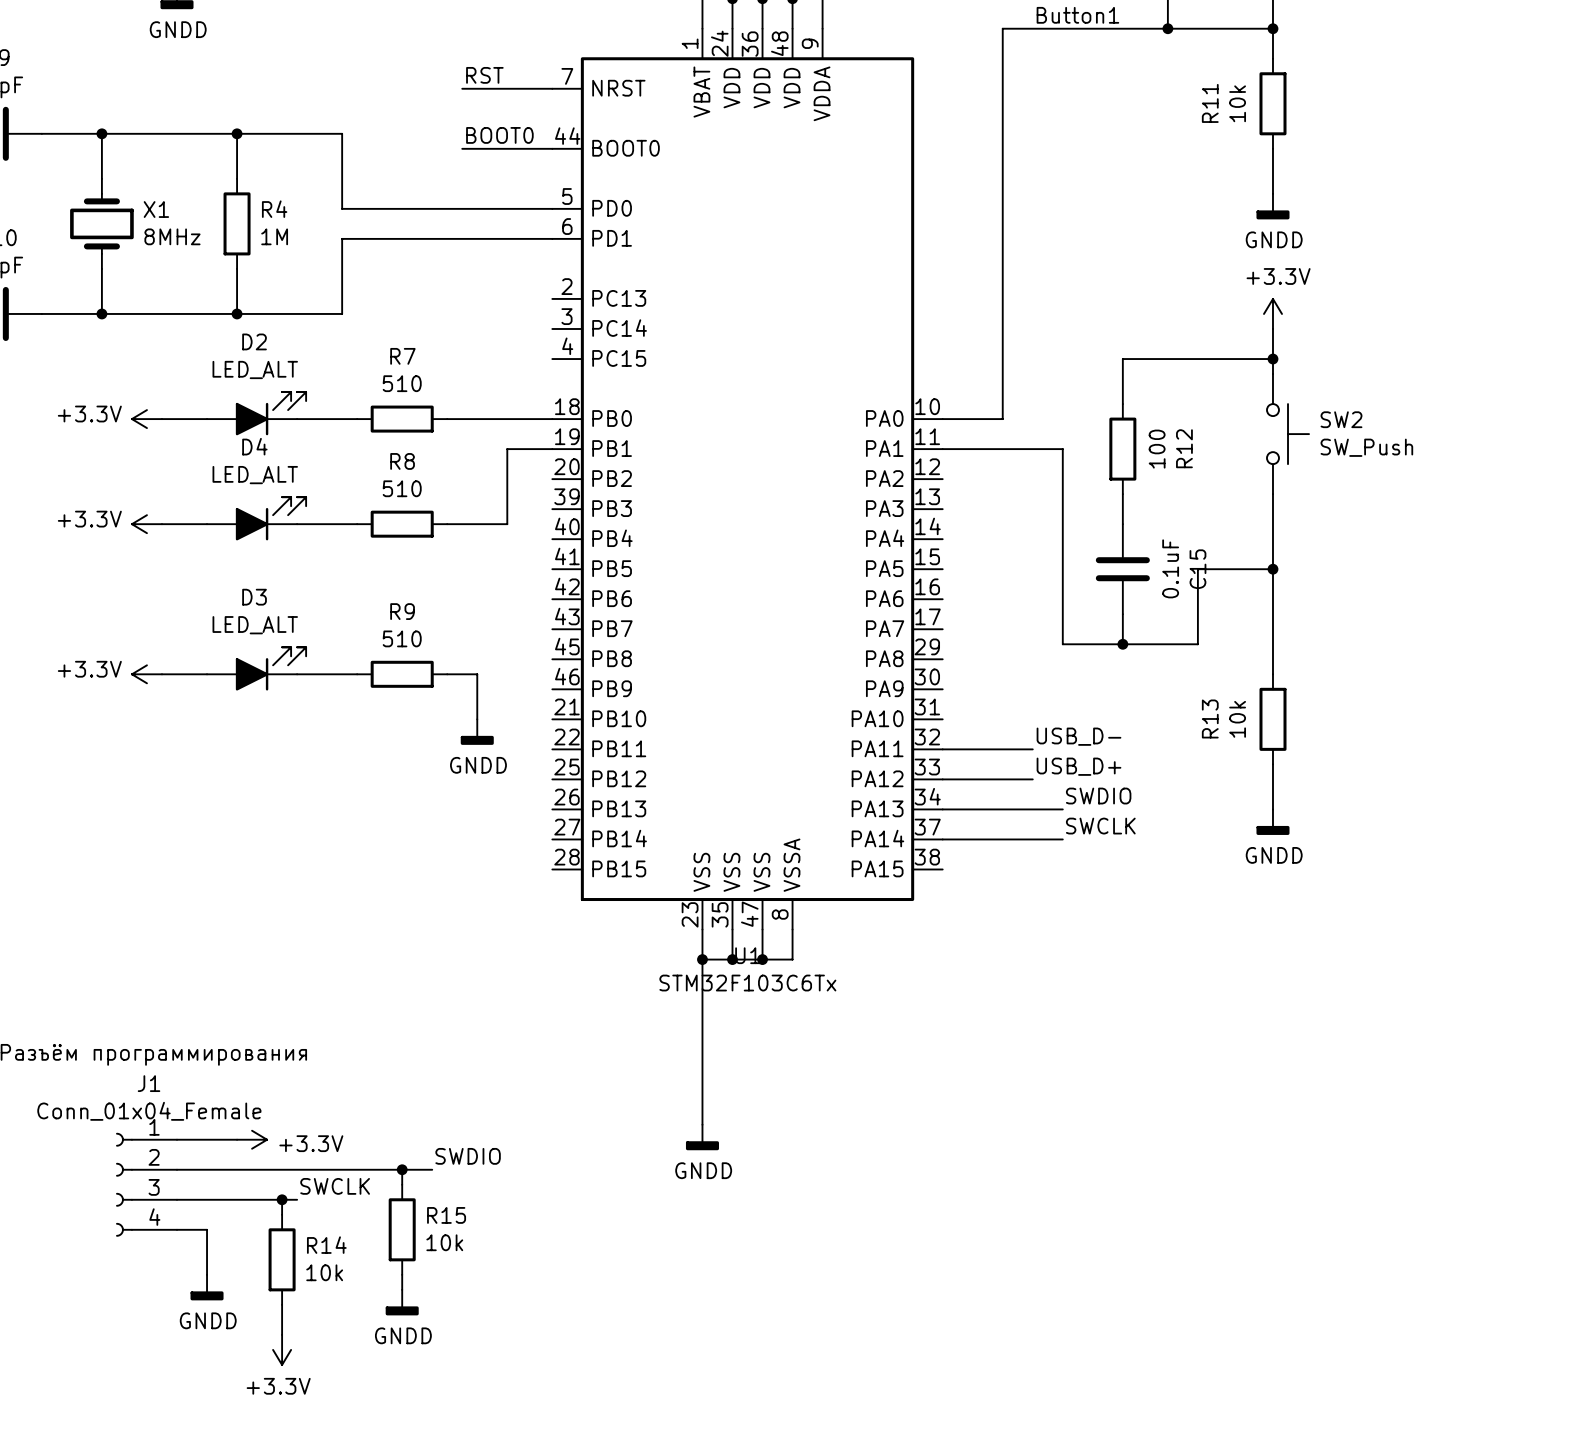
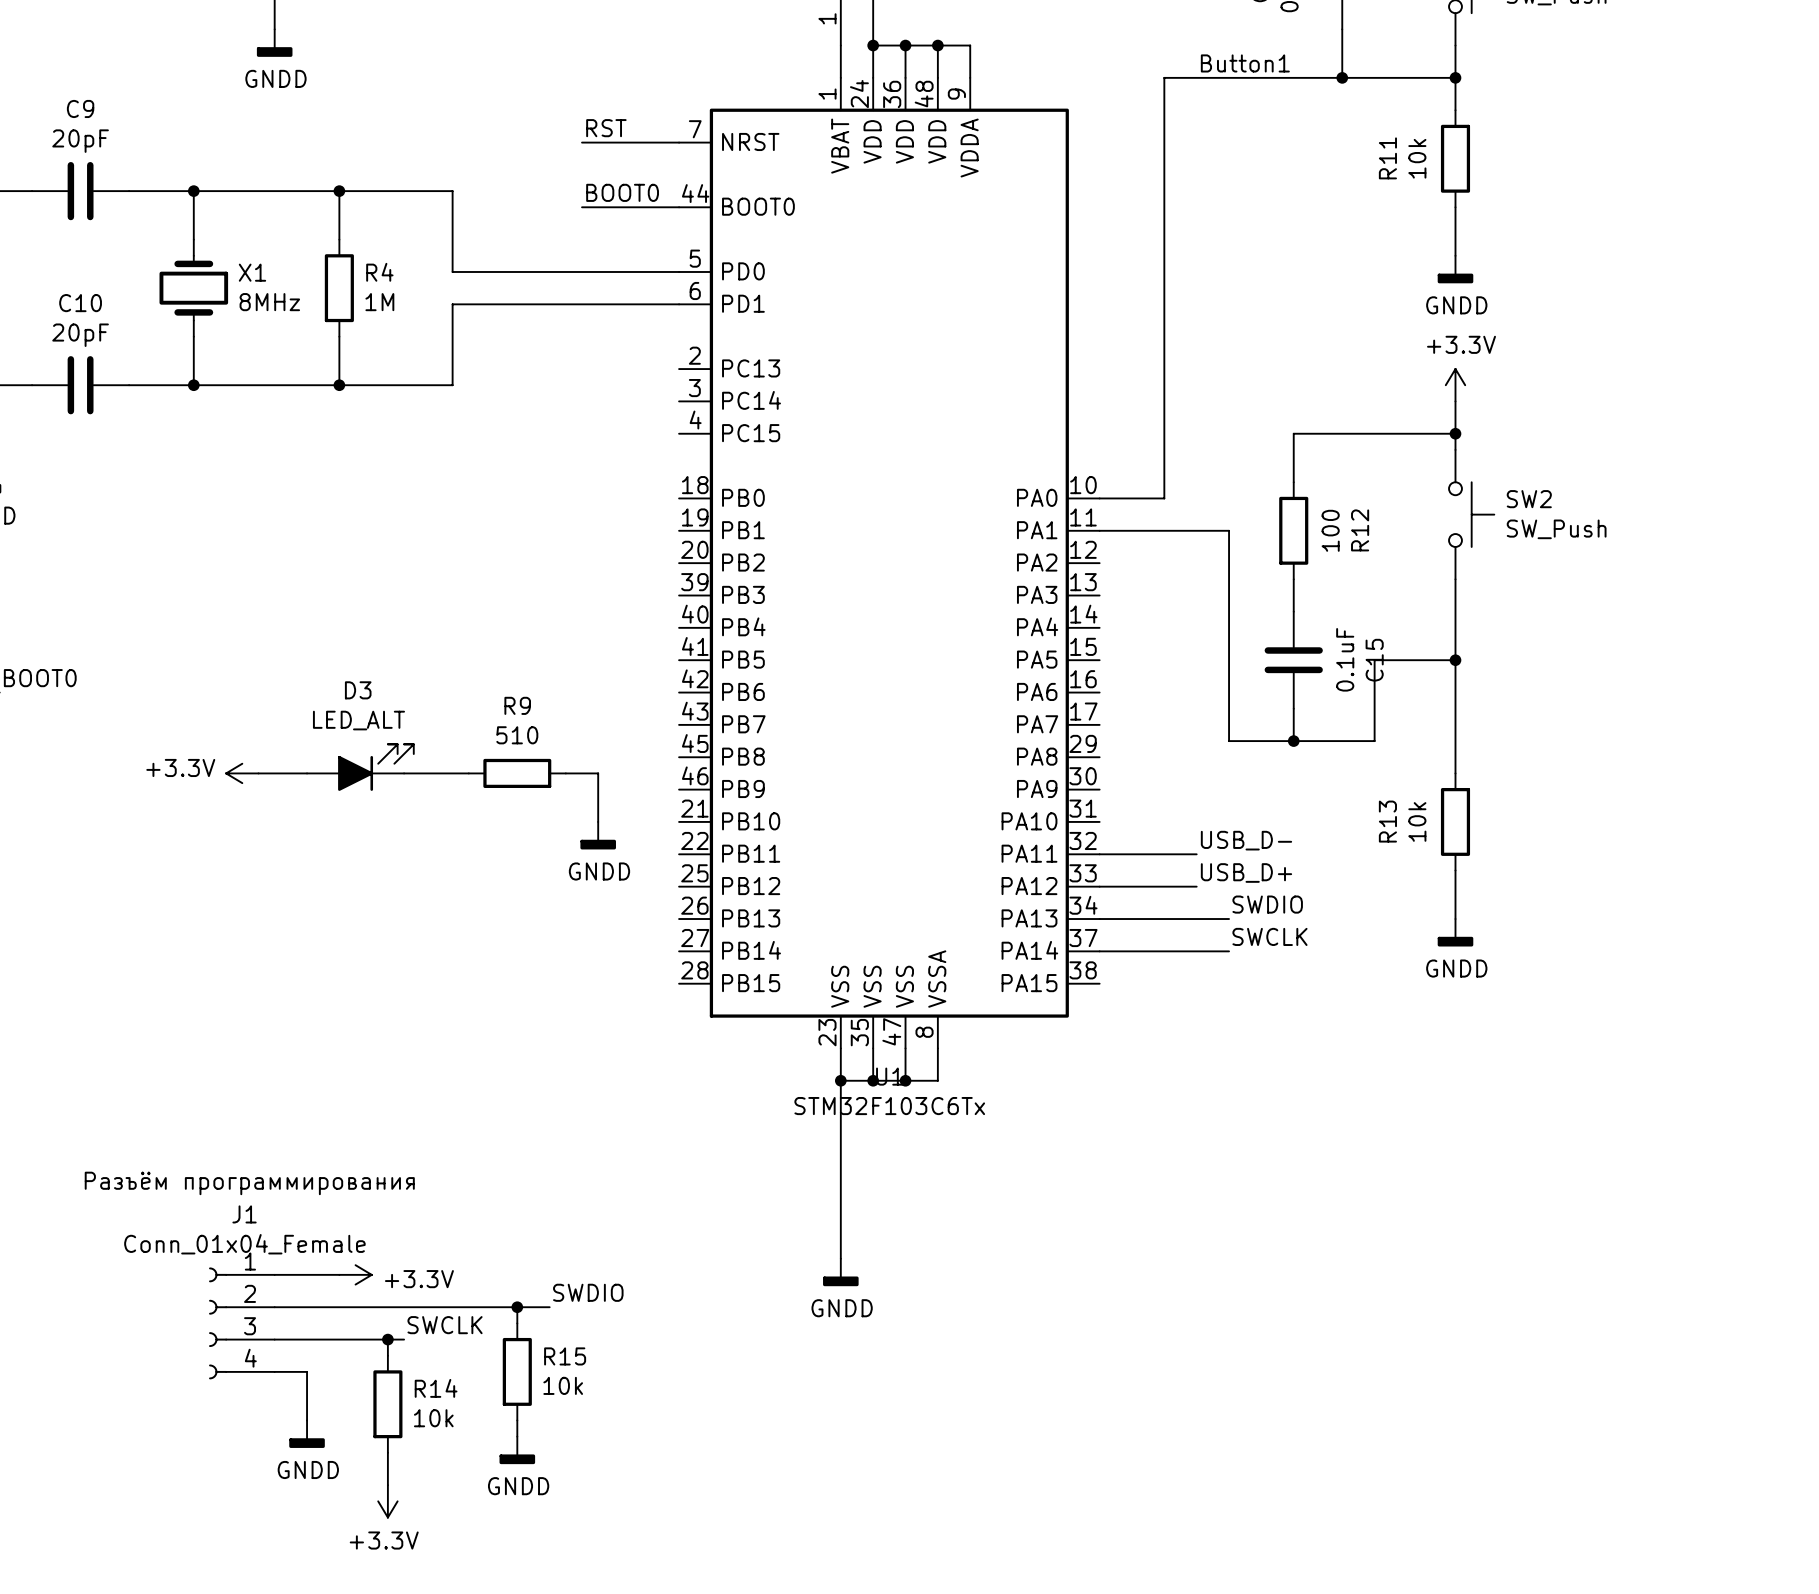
D2: LED_ALT (256, 413) -> none
power symbol: +3.3V (146, 419) -> none
wire: (161, 419) (207, 419) -> none
wire: (297, 419) (357, 419) -> none
R7: 510 (402, 419) -> none
wire: (447, 419) (552, 419) -> none
wire: (552, 449) (507, 449) (507, 524) (447, 524) -> none
D4: LED_ALT (256, 518) -> none
power symbol: +3.3V (146, 524) -> none
wire: (161, 524) (207, 524) -> none
wire: (297, 524) (357, 524) -> none
R8: 510 (402, 524) -> none

